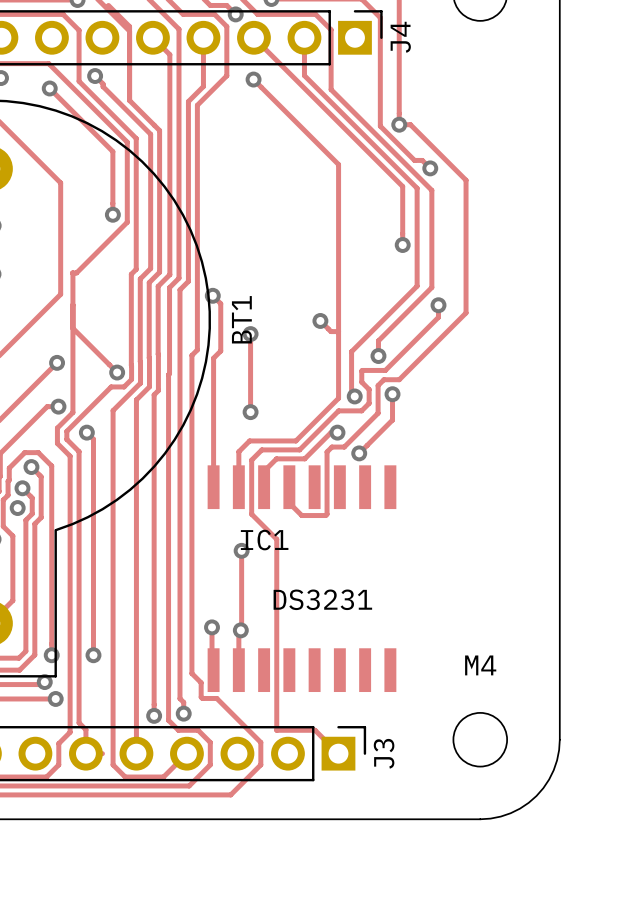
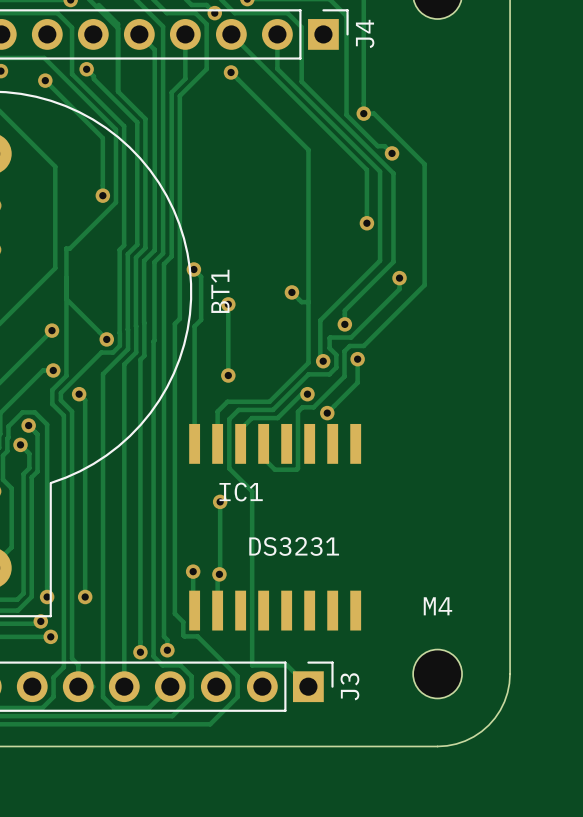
via: (17, 508) -> none

